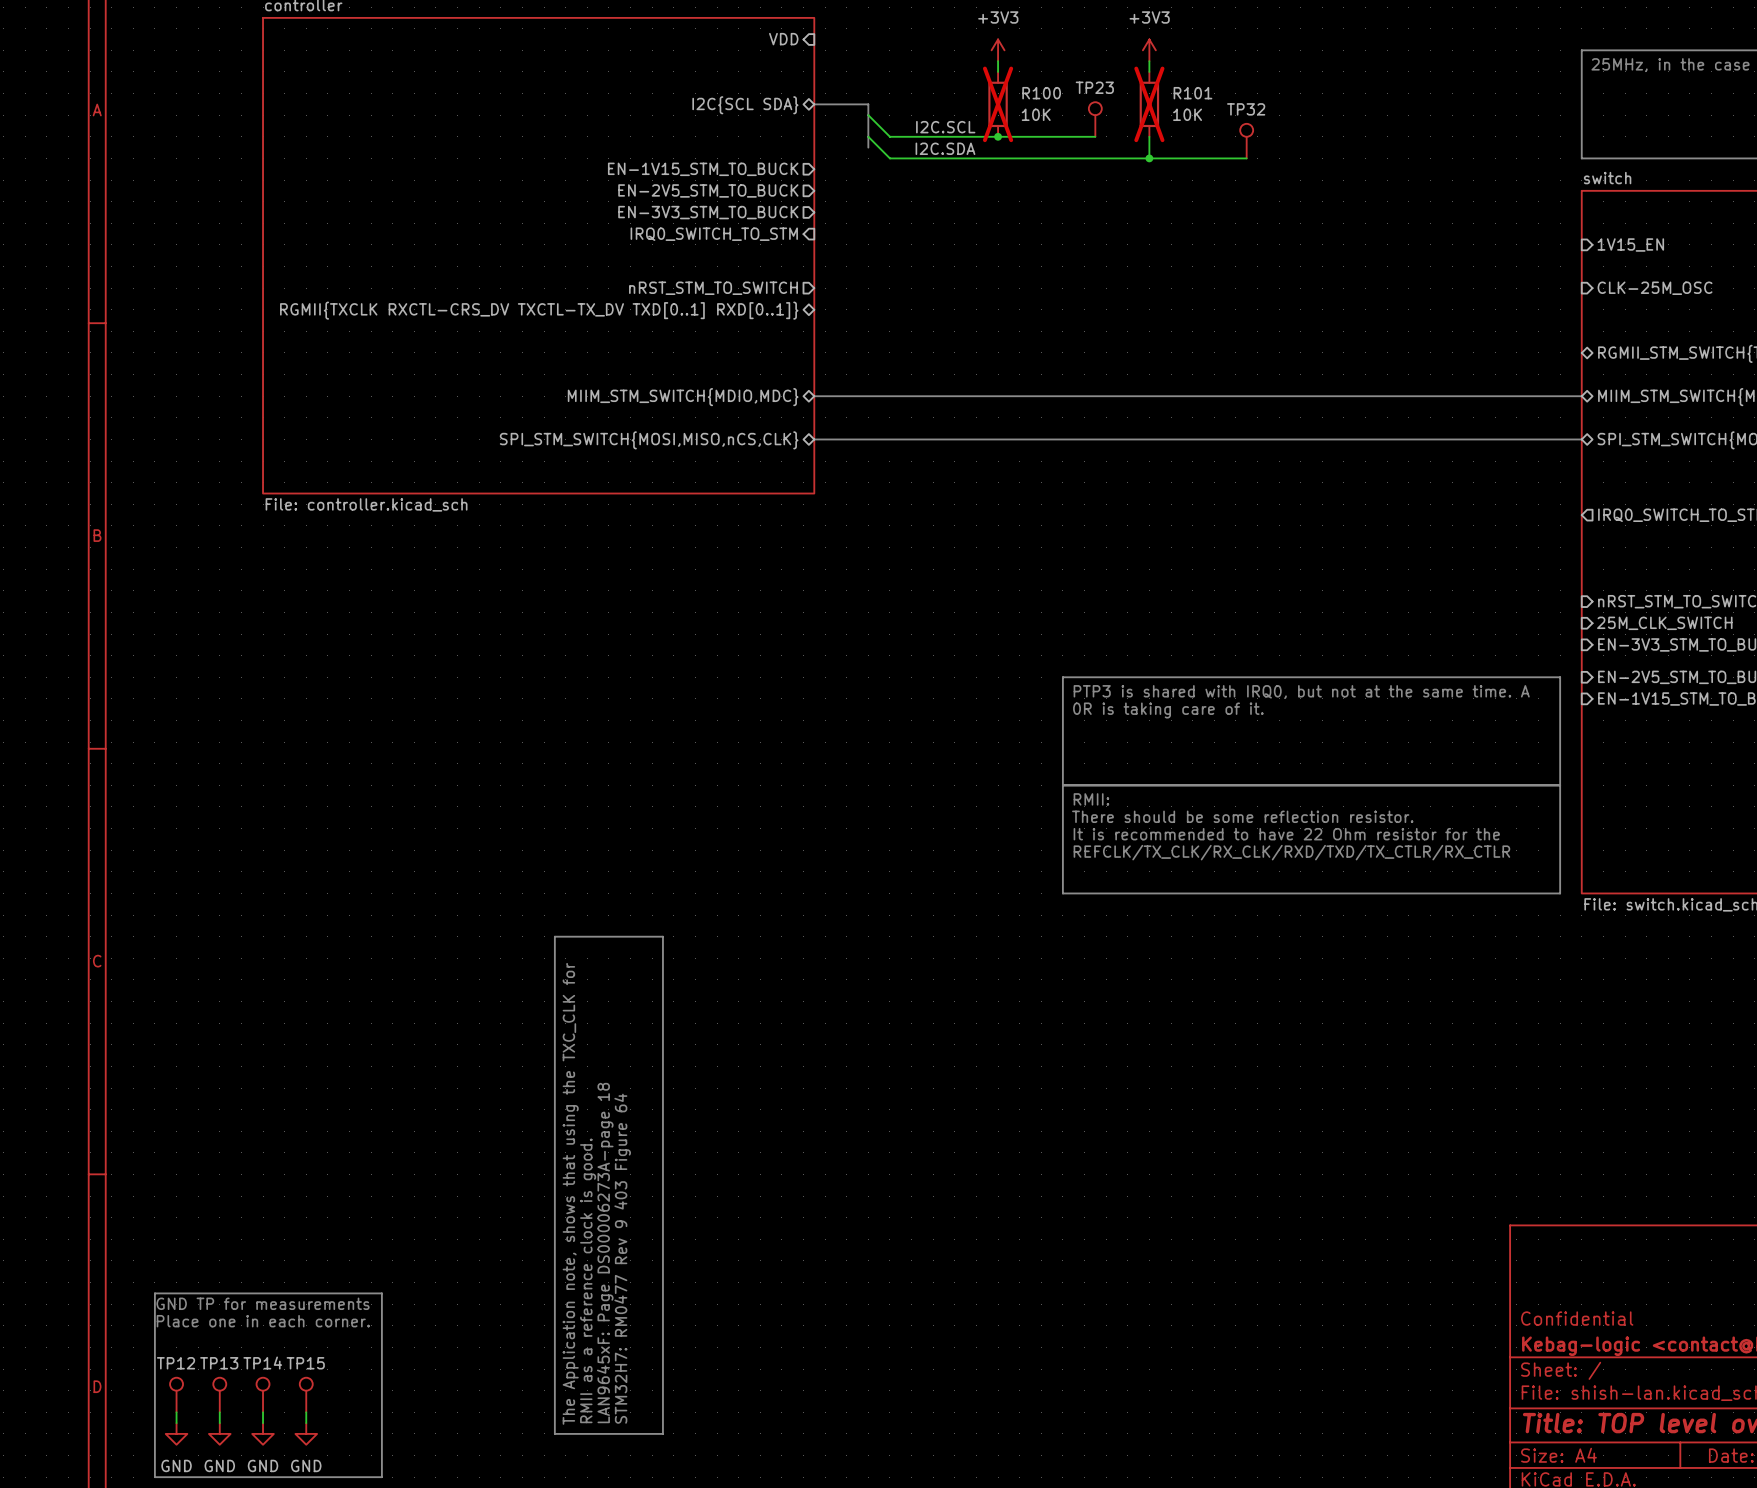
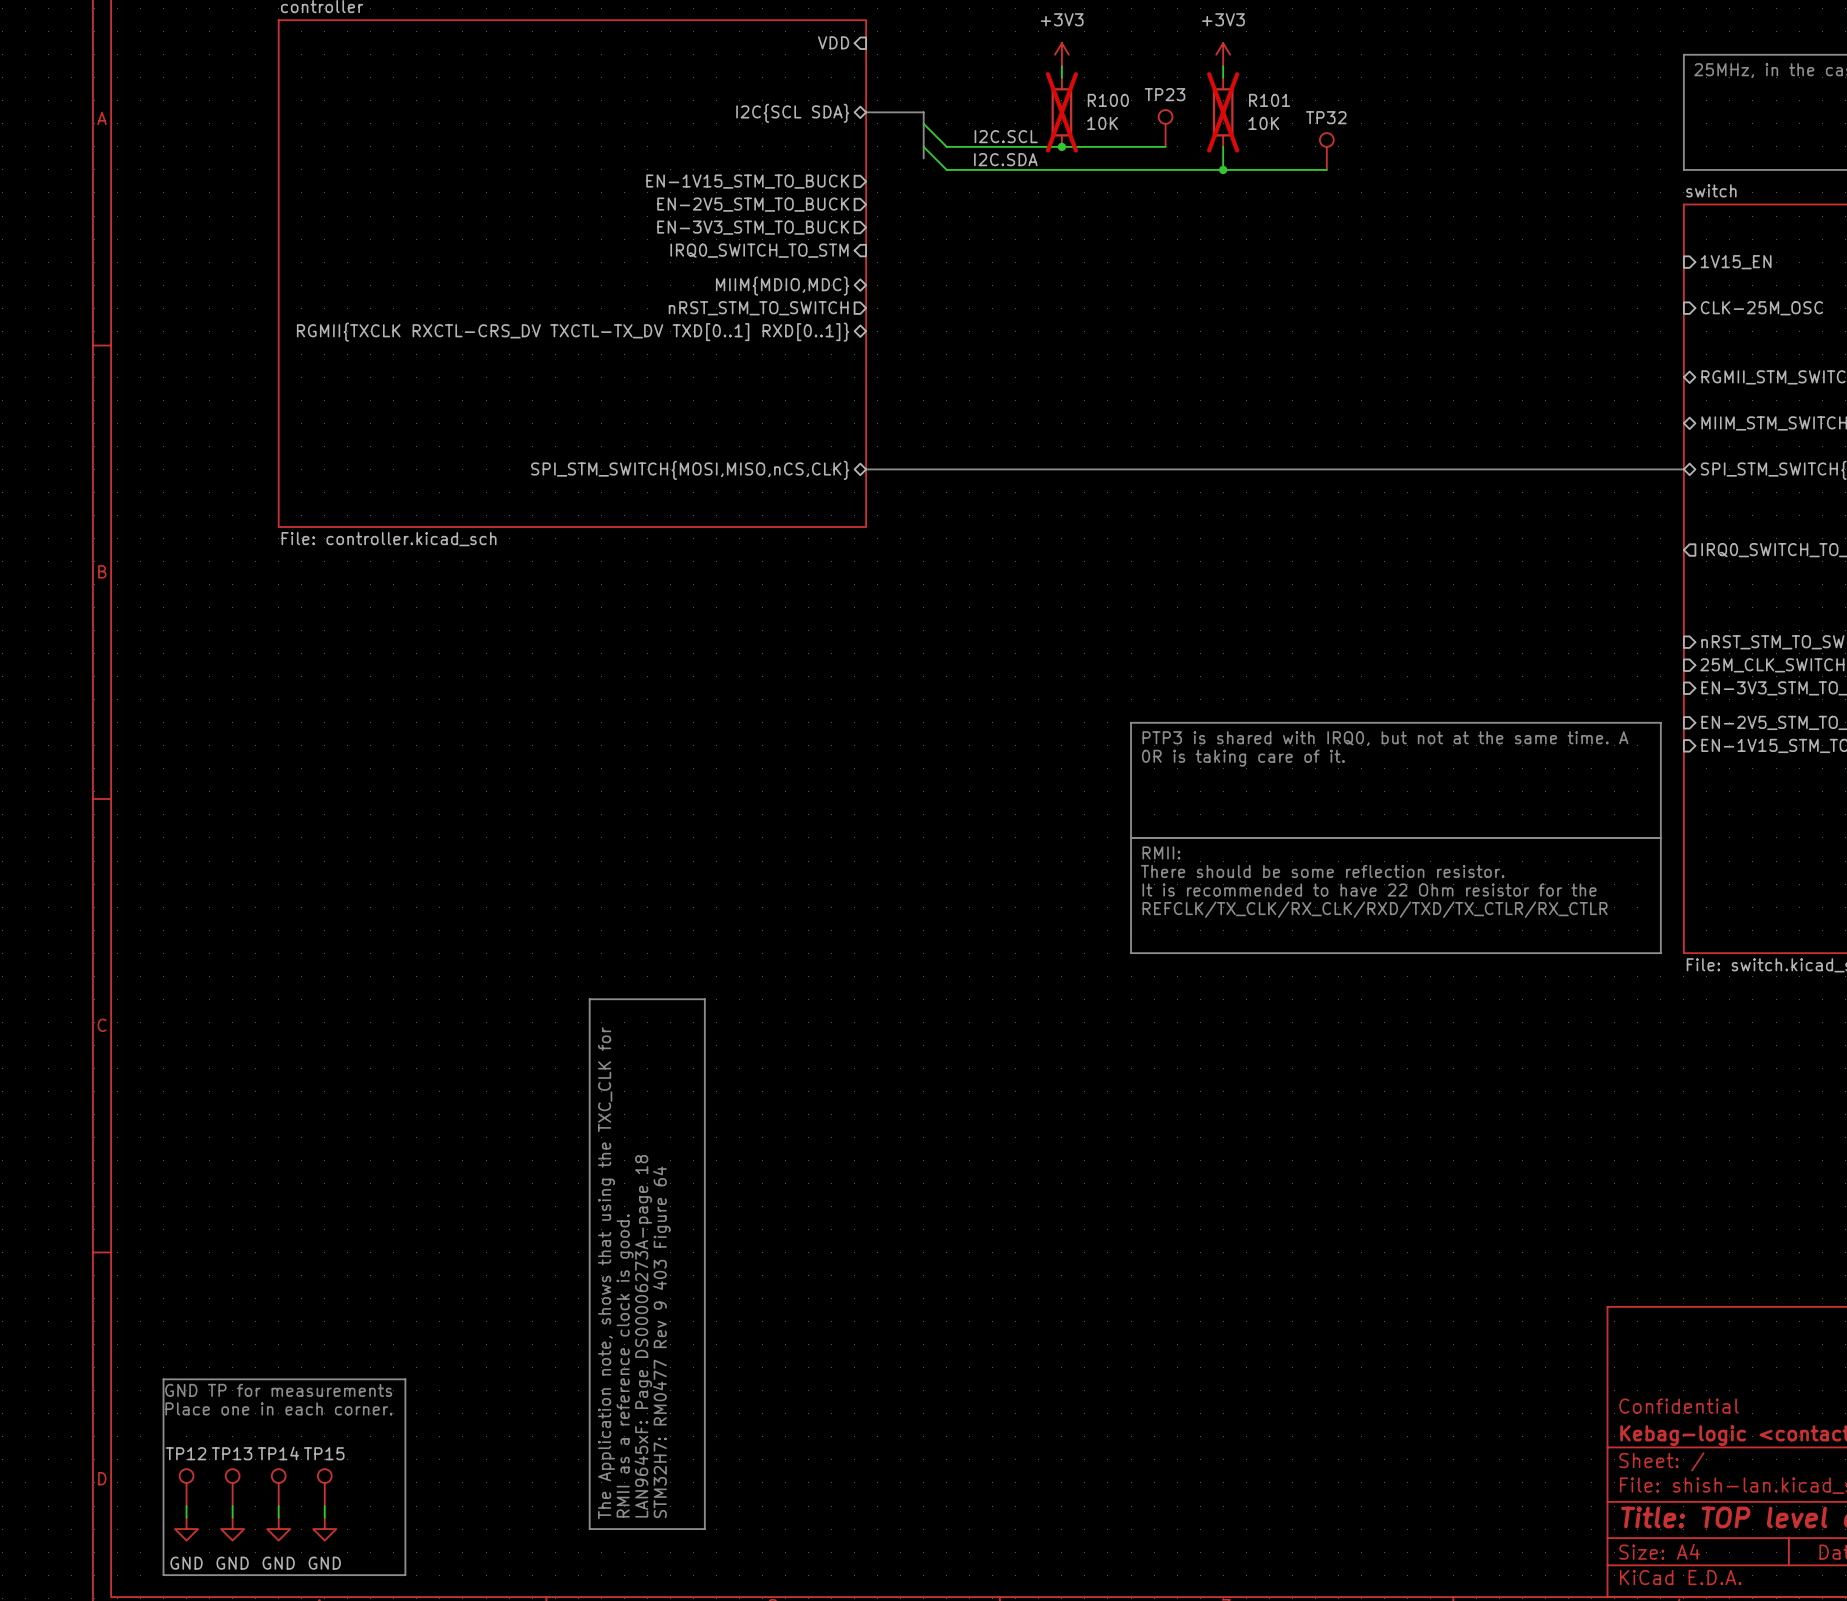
sheet pin: none -> MIIM{MDIO,MDC} (782, 286)
bus: (814, 396) (1581, 396) -> none
sheet pin: MIIM_STM_SWITCH{MDIO,MDC} (683, 397) -> none

